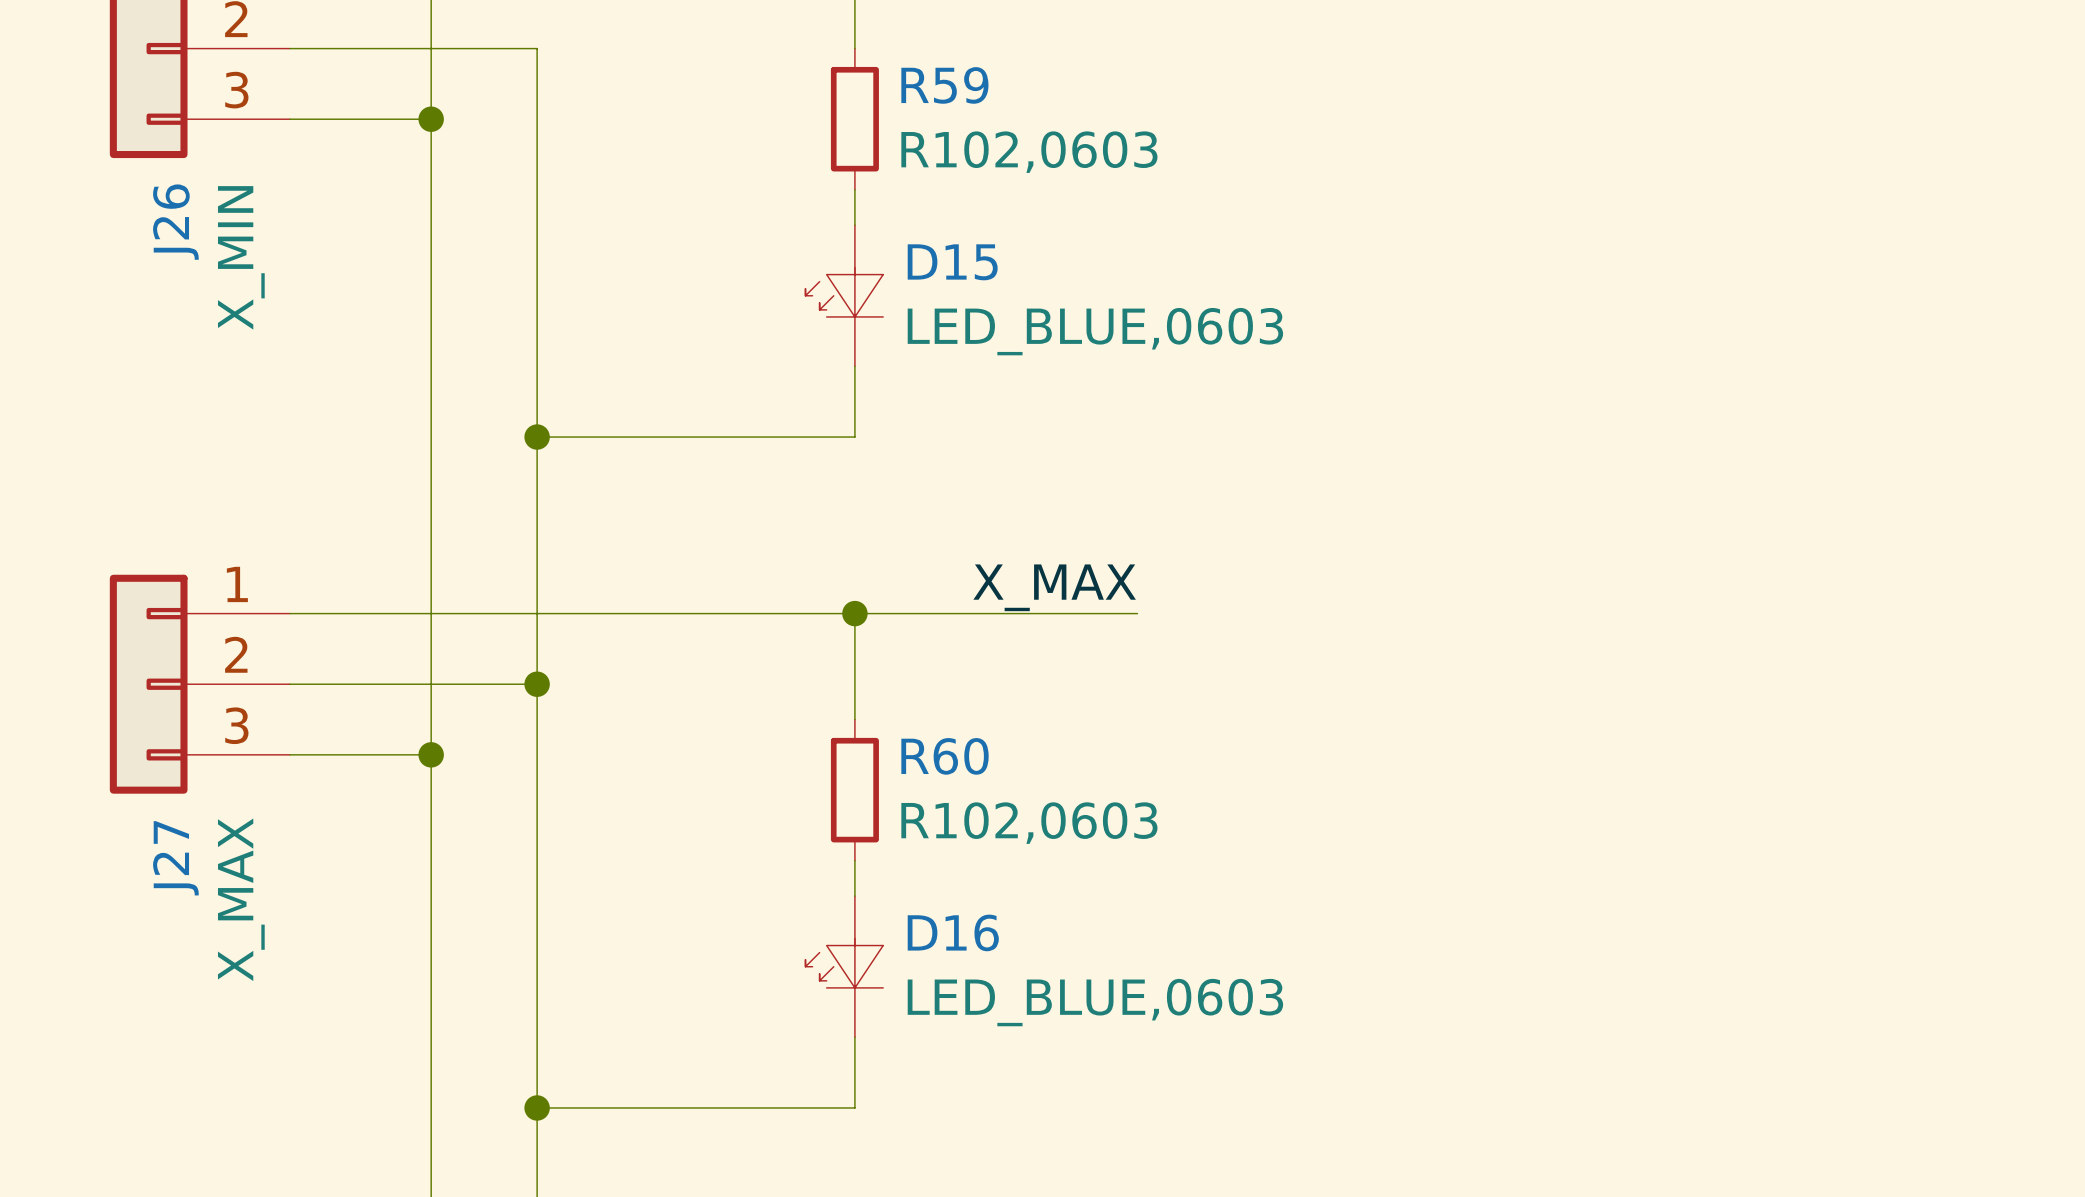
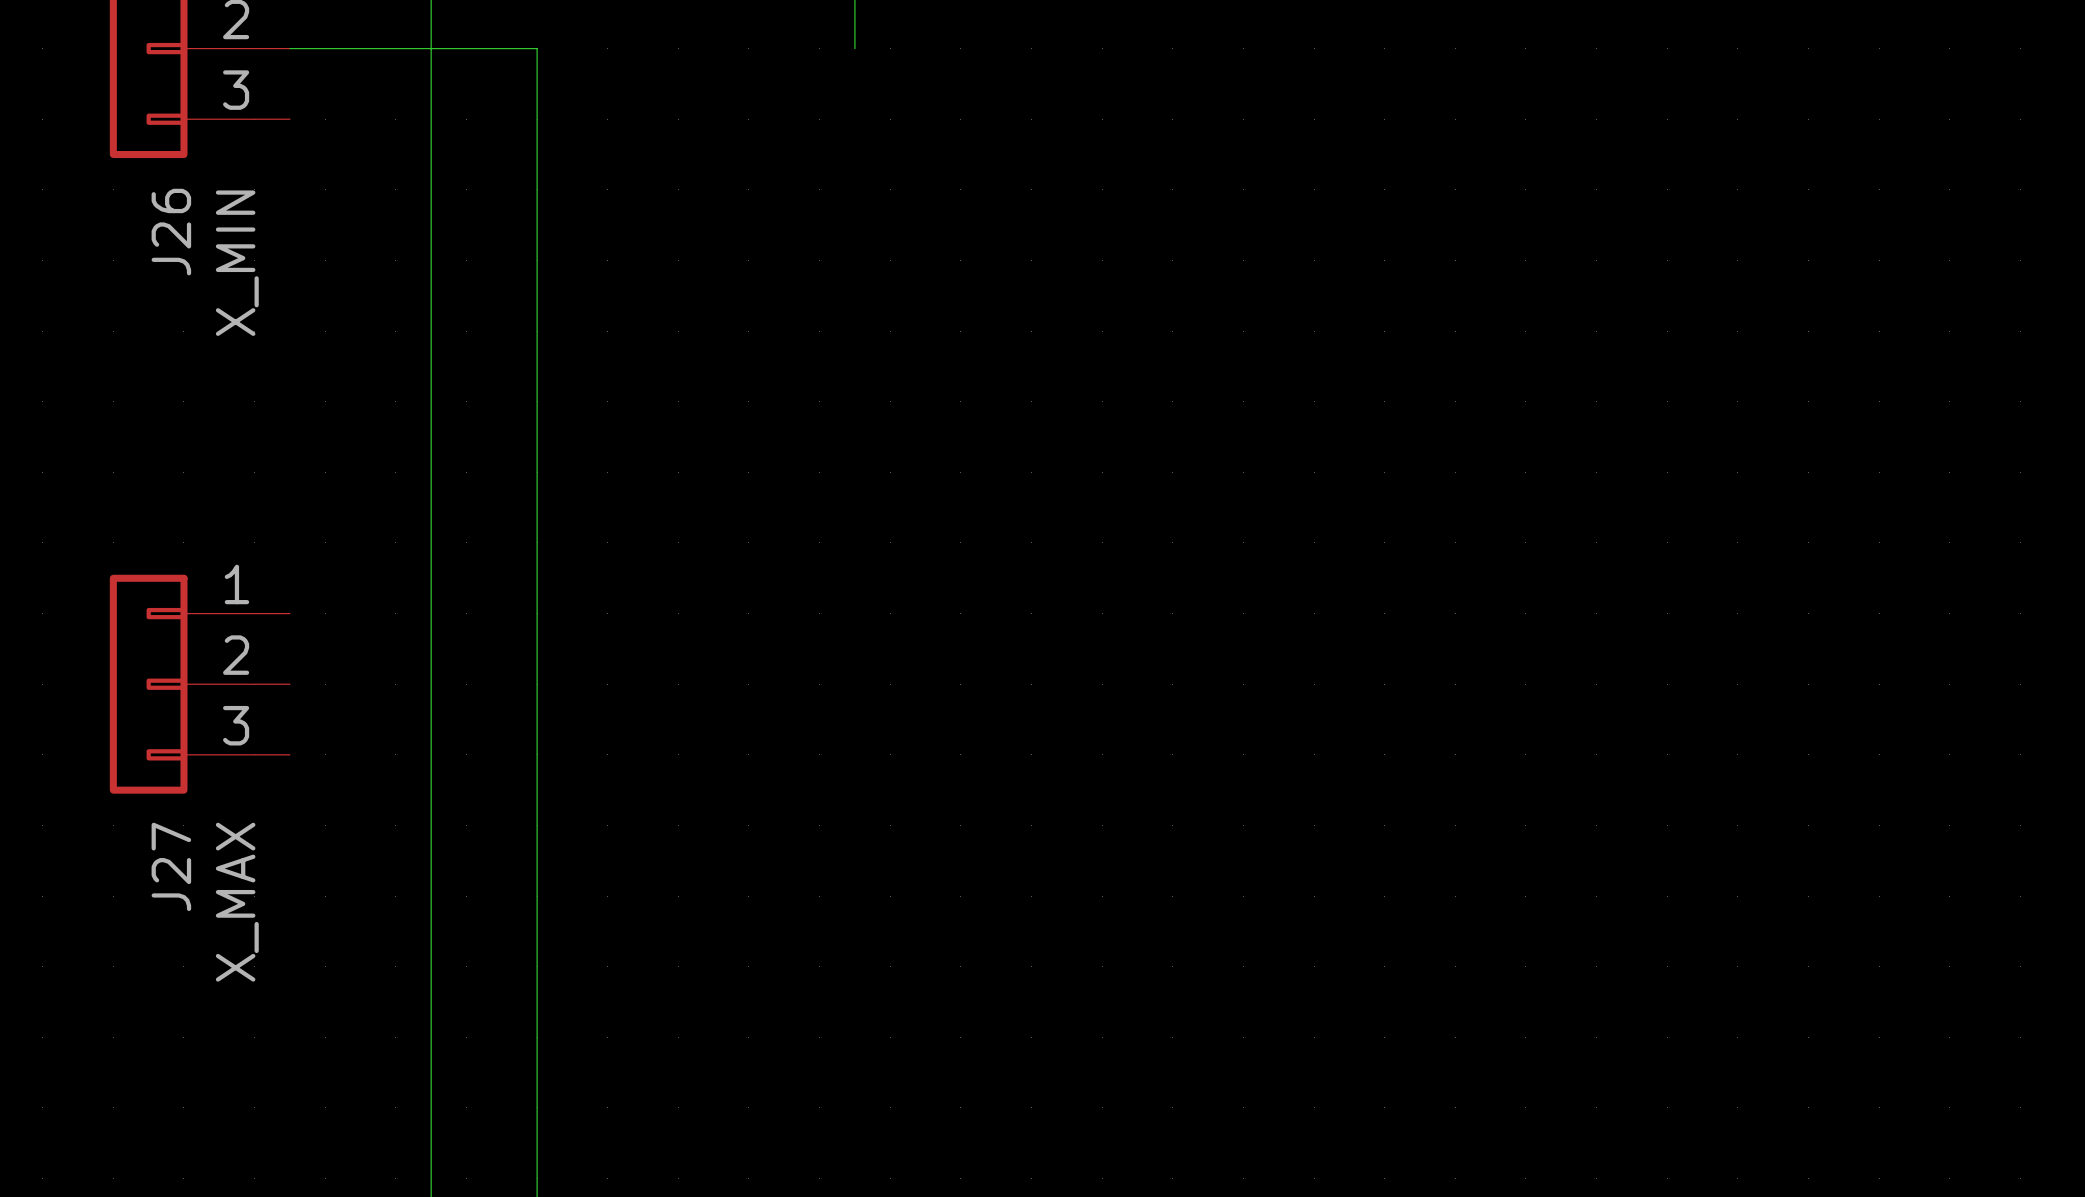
wire: (289, 119) (431, 119) -> none
junction: (431, 119) -> none
R59: R102,0603 (854, 119) -> none
wire: (854, 189) (854, 225) -> none
D15: LED_BLUE,0603 (844, 295) -> none
wire: (854, 366) (854, 437) (537, 437) -> none
junction: (537, 437) -> none
label: X_MAX (1054, 587) -> none
wire: (289, 613) (1137, 613) -> none
wire: (854, 613) (854, 719) -> none
junction: (854, 613) -> none
wire: (289, 684) (537, 684) -> none
junction: (537, 684) -> none
wire: (289, 754) (431, 754) -> none
junction: (431, 754) -> none
R60: R102,0603 (854, 790) -> none
wire: (854, 860) (854, 896) -> none
D16: LED_BLUE,0603 (844, 966) -> none
wire: (854, 1037) (854, 1107) (537, 1107) -> none
junction: (537, 1107) -> none

